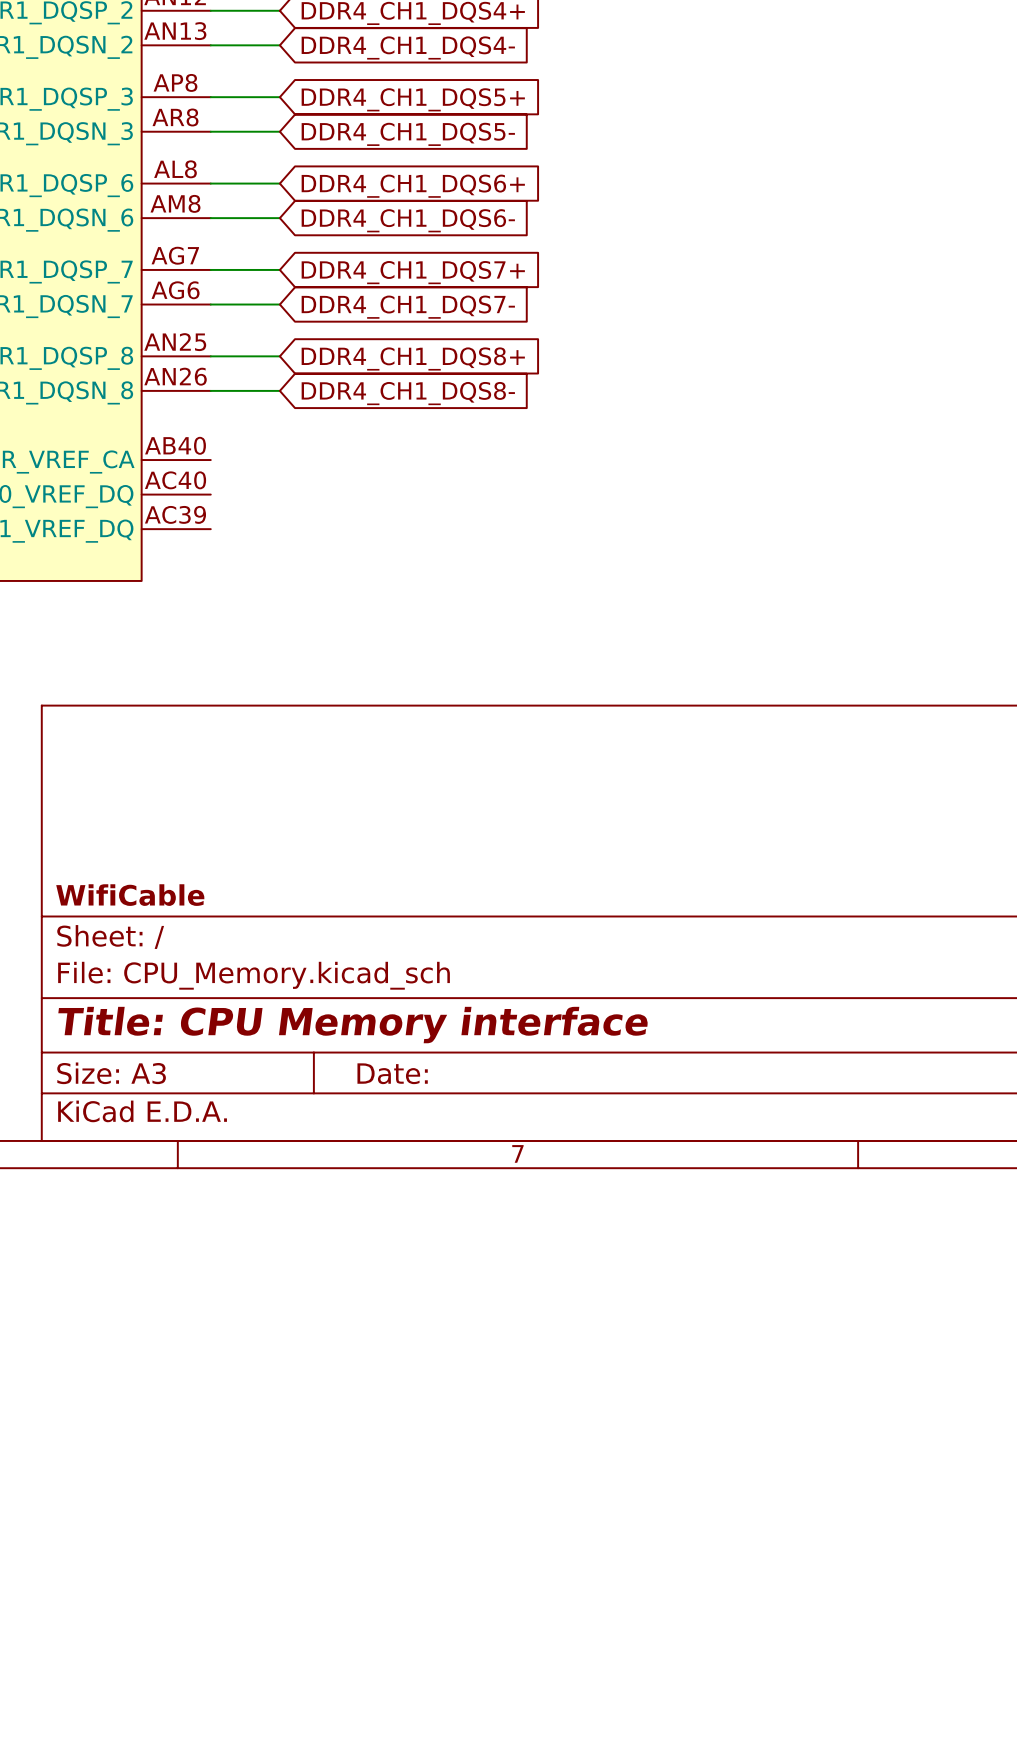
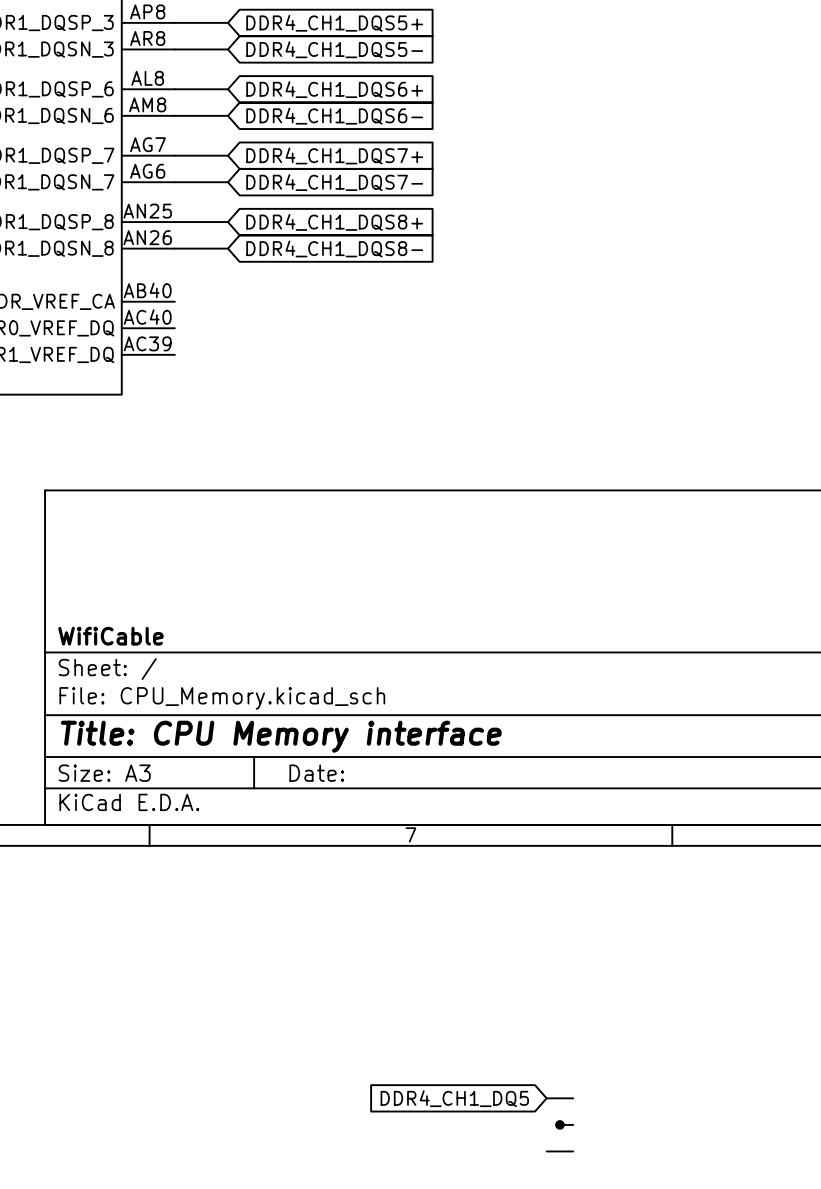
wire: none -> (546, 1098) (573, 1098)
global label: none -> DDR4_CH1_DQ5 (454, 1098)
wire: none -> (559, 1124) (573, 1124)
junction: none -> (559, 1124)
wire: none -> (546, 1151) (573, 1151)

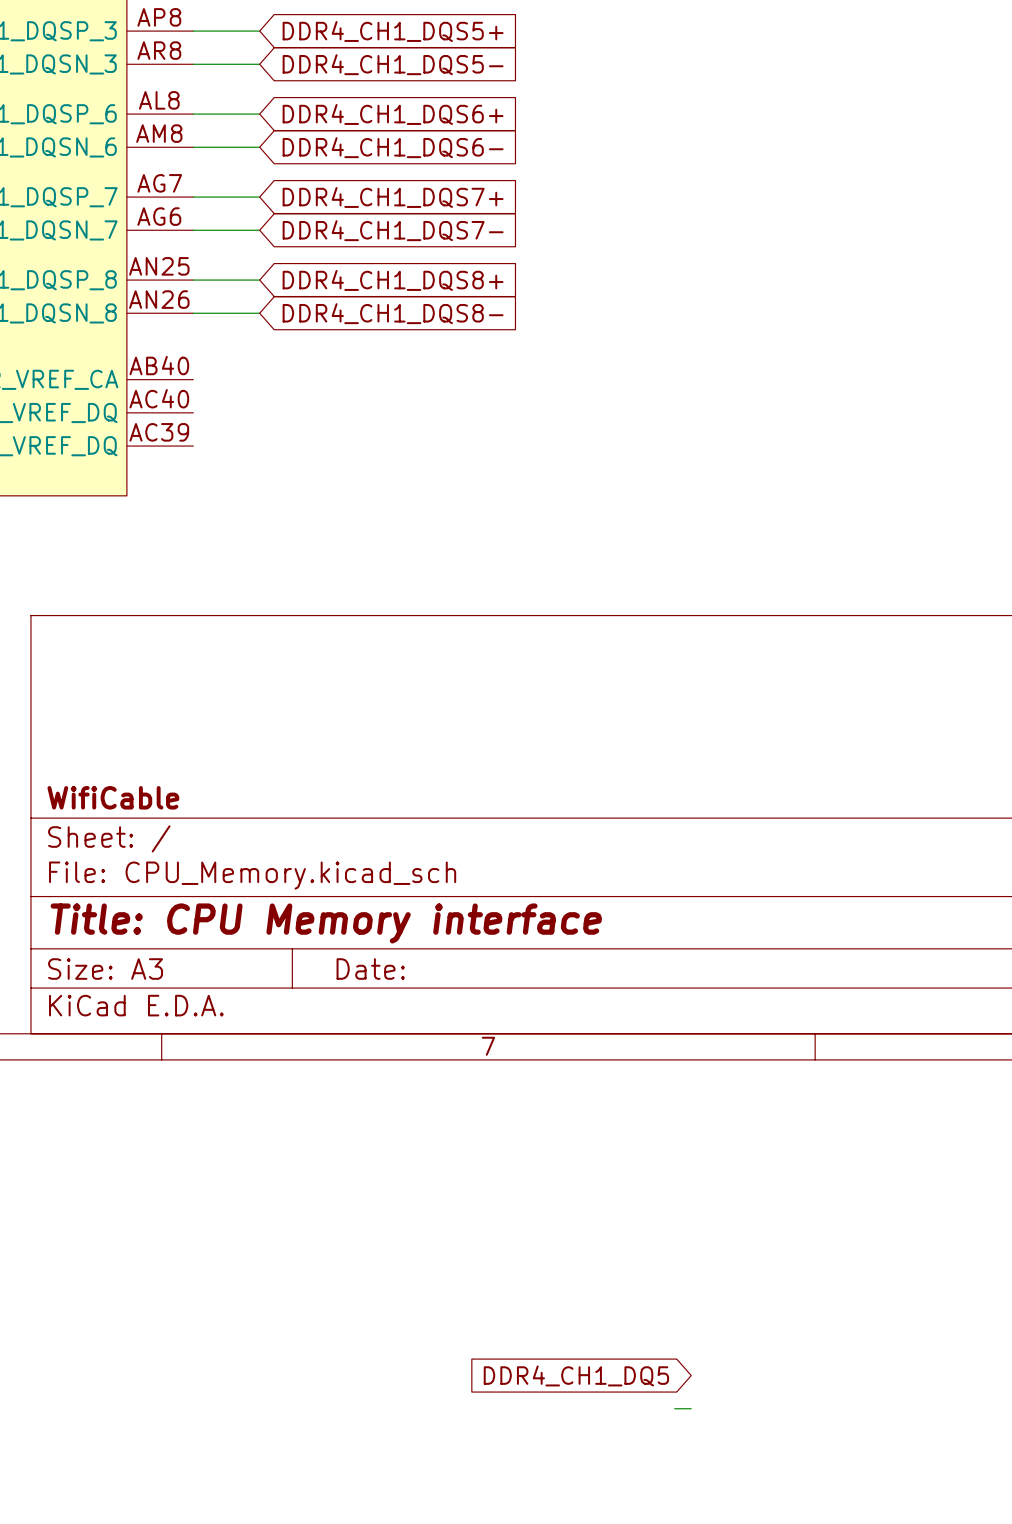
global label position: DDR4_CH1_DQ5 (454, 1098) -> DDR4_CH1_DQ5 (576, 1375)
wire: (546, 1098) (573, 1098) -> none
junction: (559, 1124) -> none
wire: (546, 1151) (573, 1151) -> none

